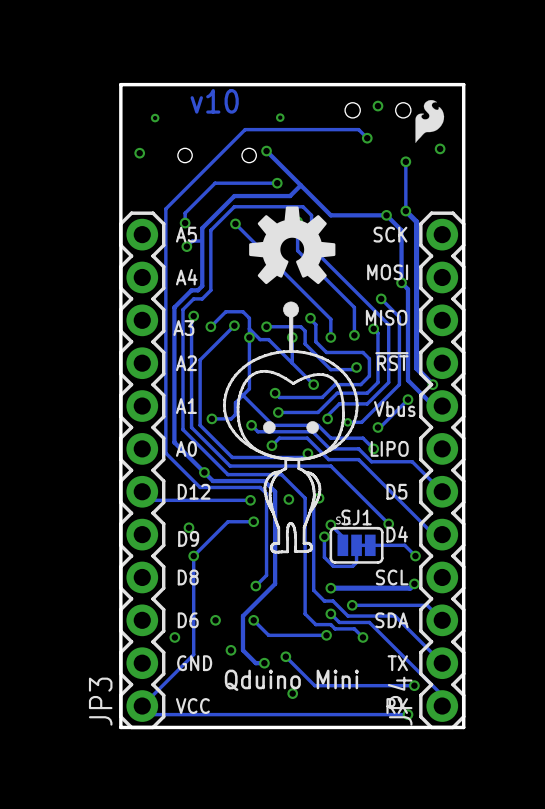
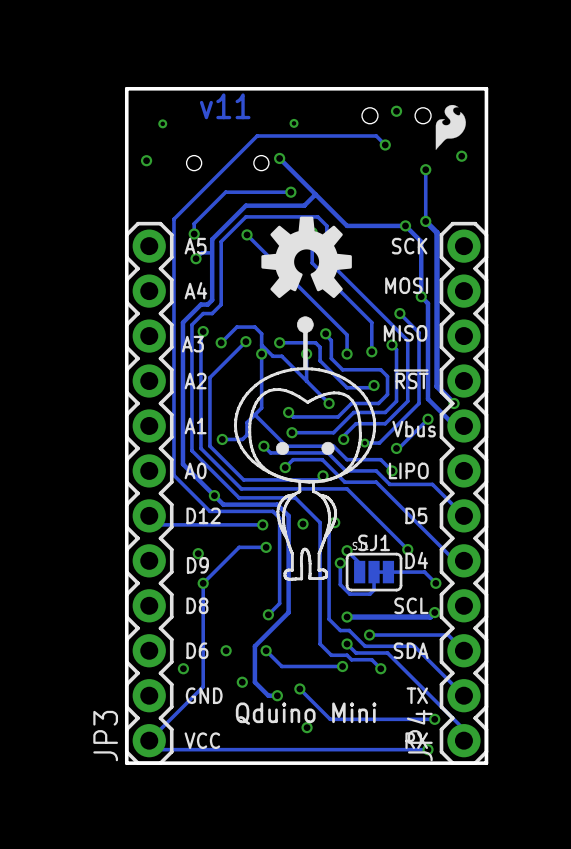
text: v10 (214, 101) -> v11 (225, 106)

